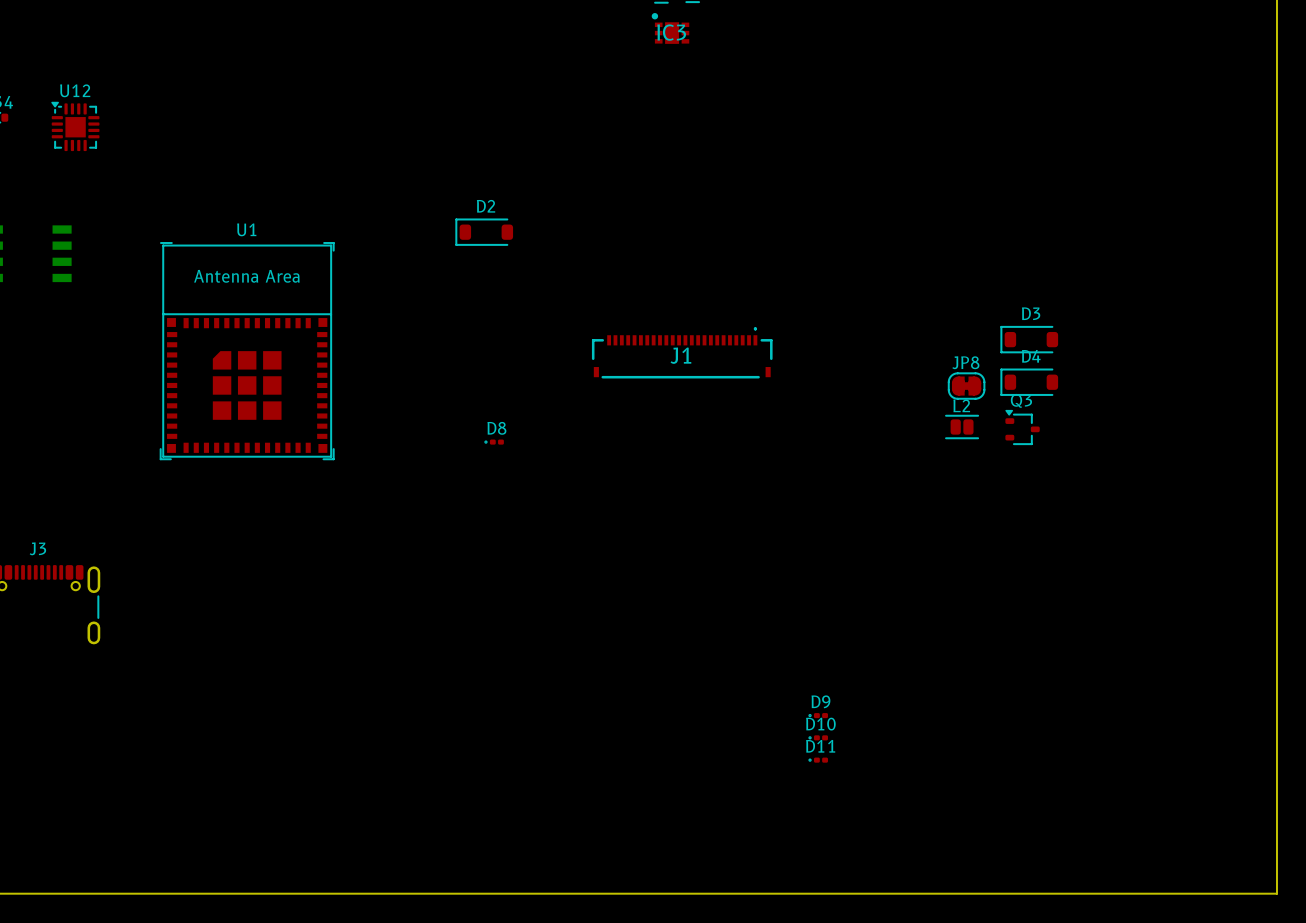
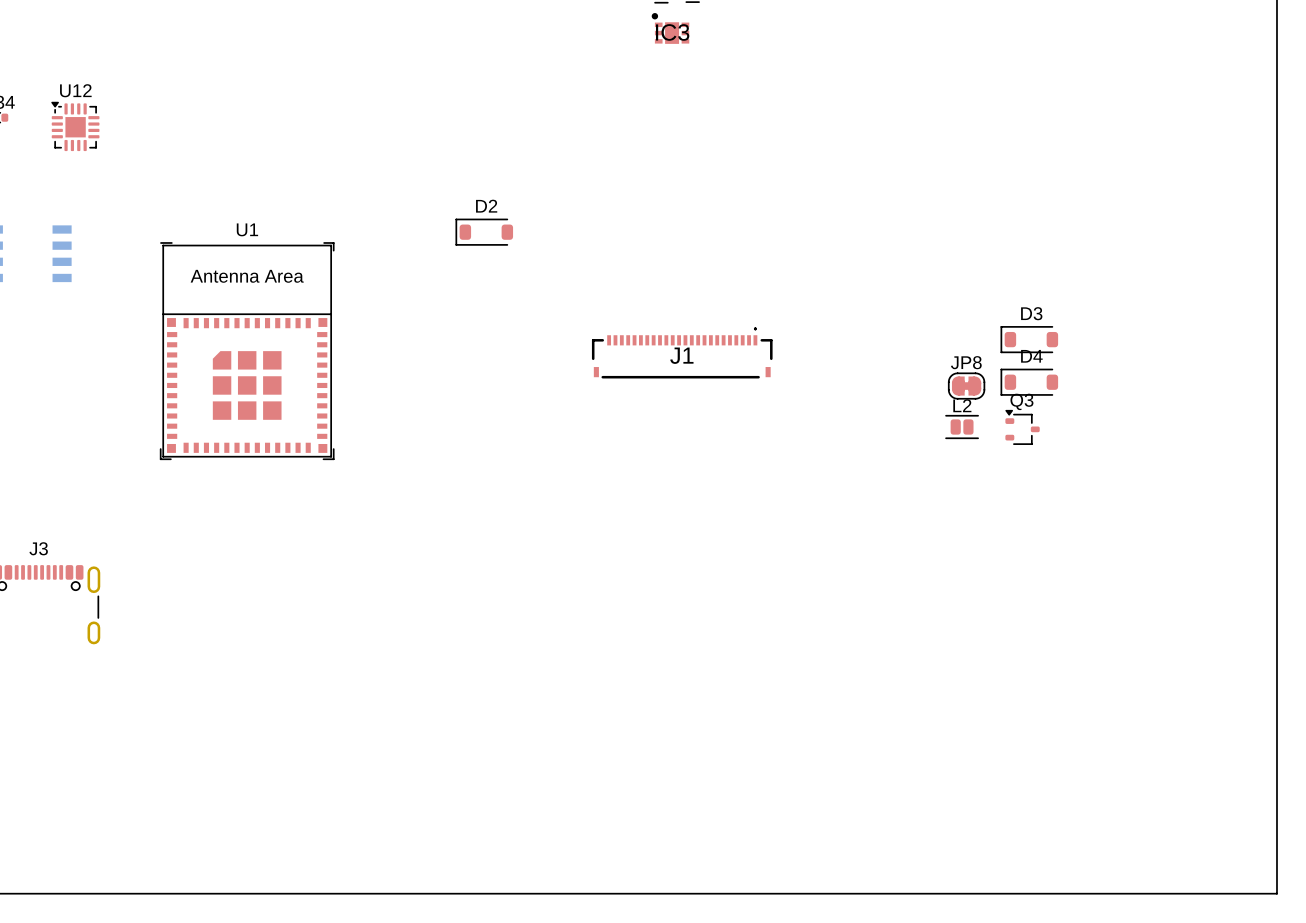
D8: (494, 442) -> none
D9: (818, 715) -> none
D10: (818, 737) -> none
D11: (818, 760) -> none

